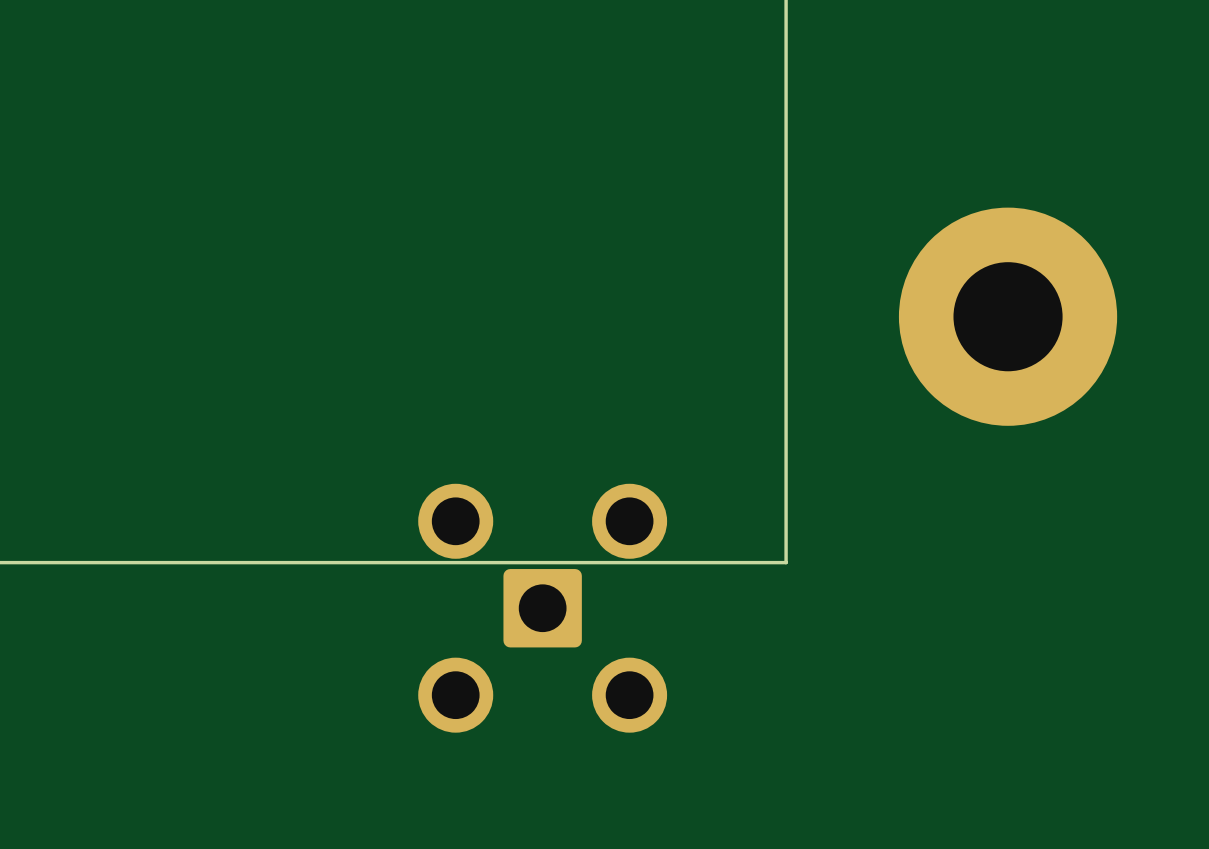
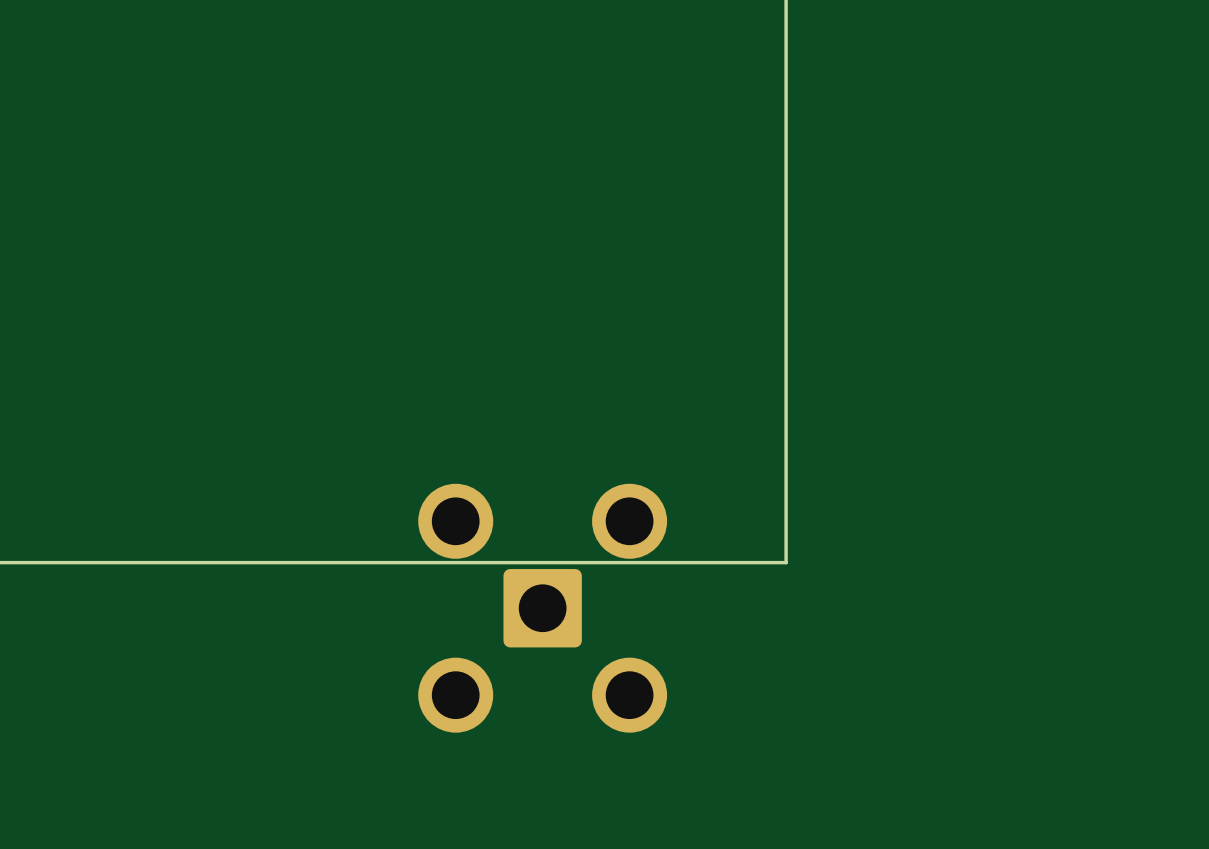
part: (1008, 316) -> none

